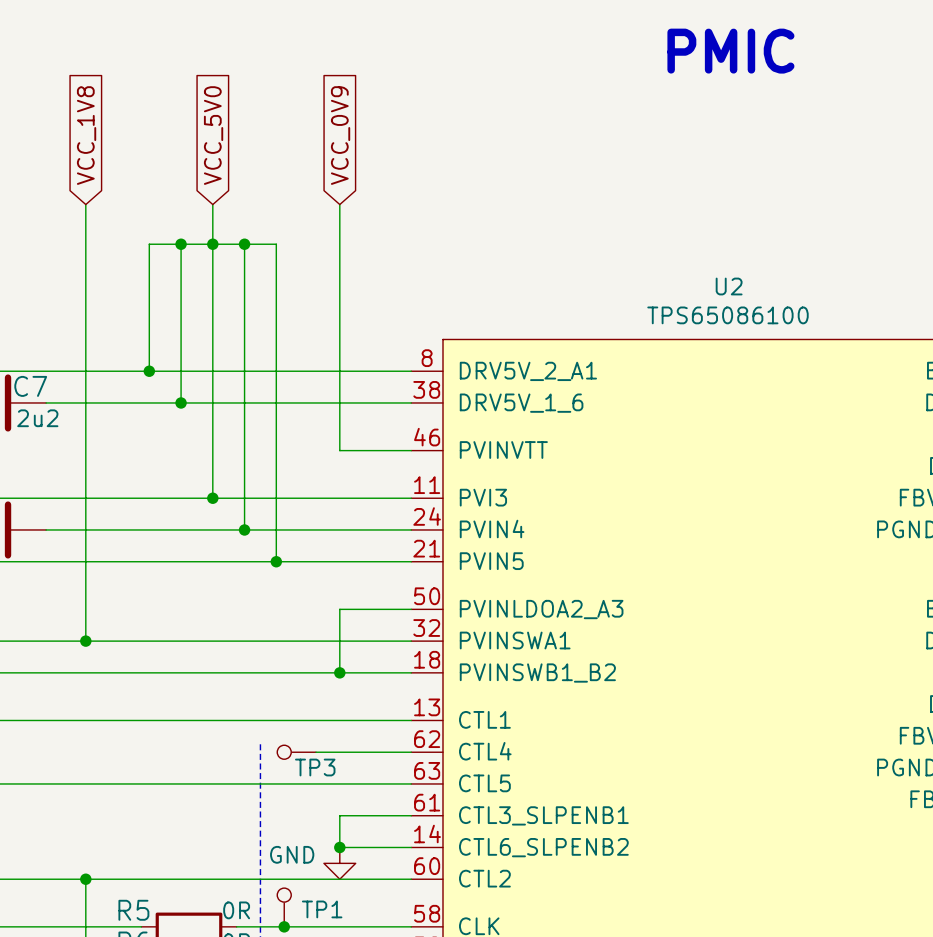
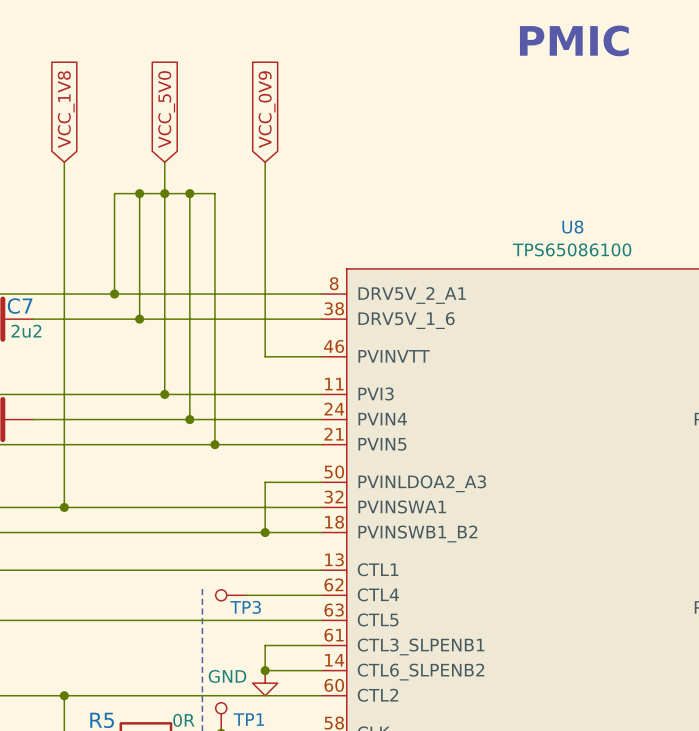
U2 name: U2 (729, 286) -> U8 (572, 227)

